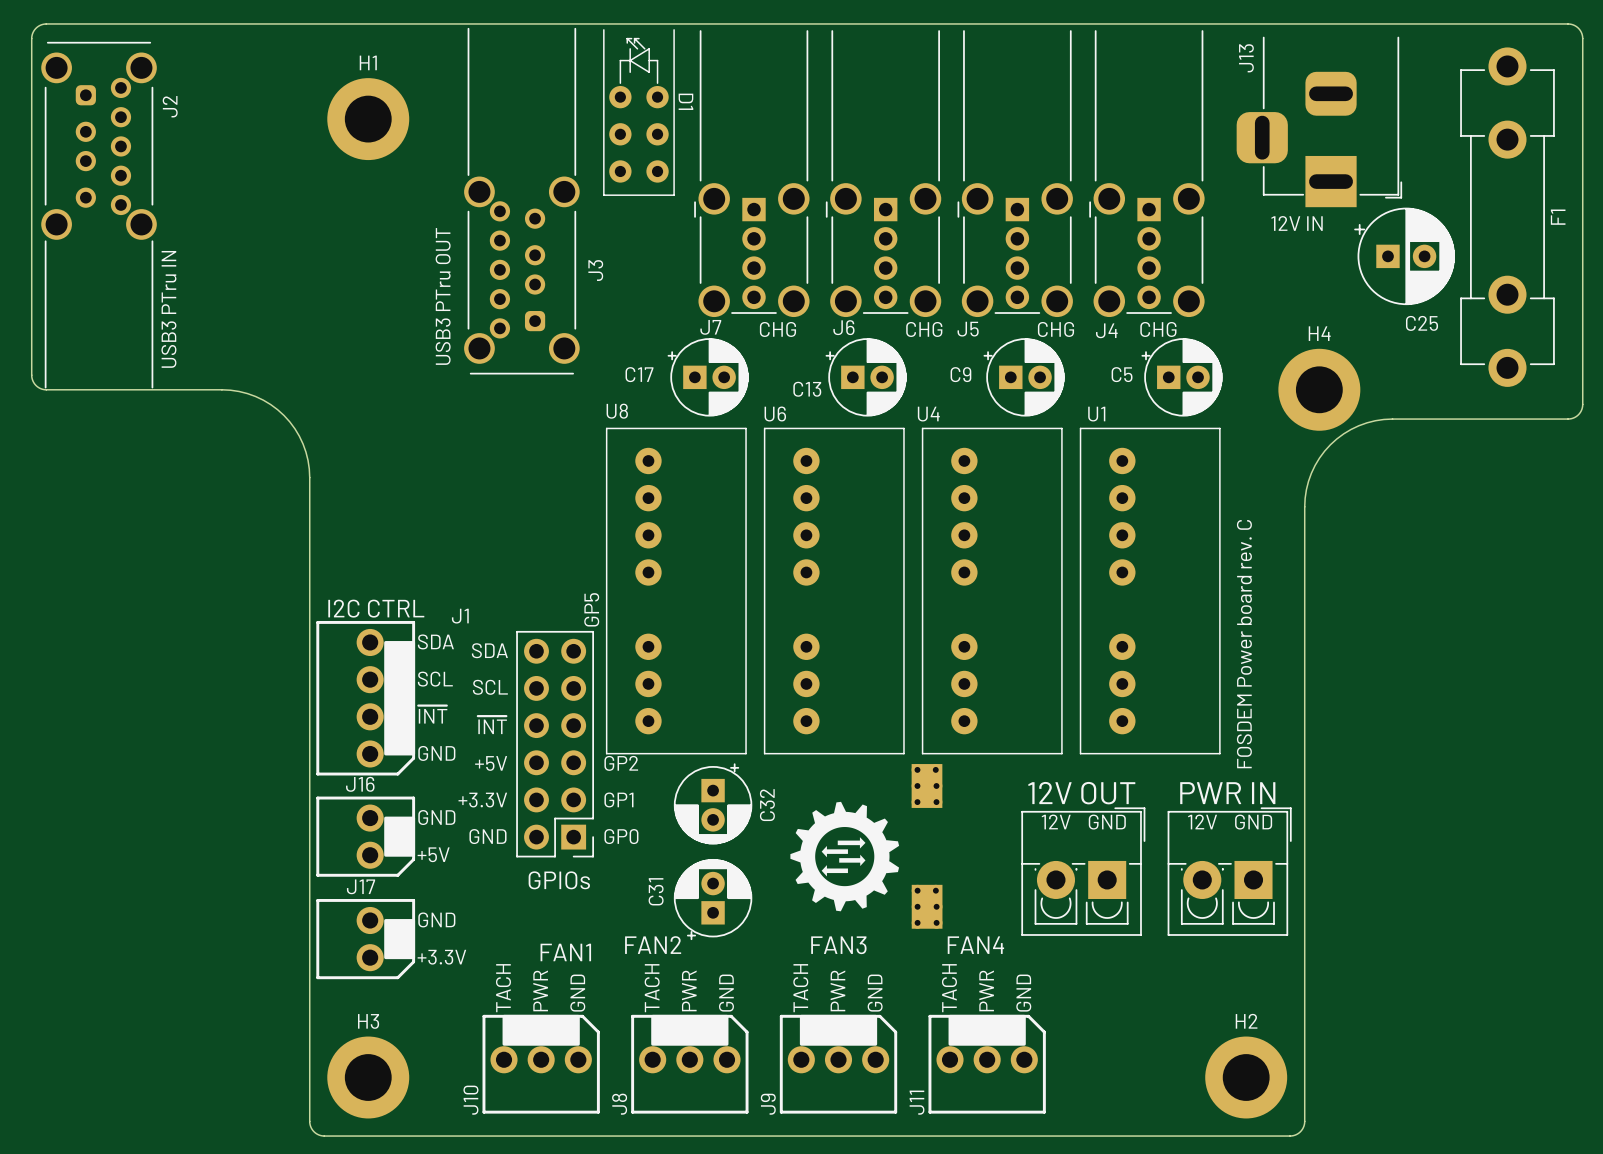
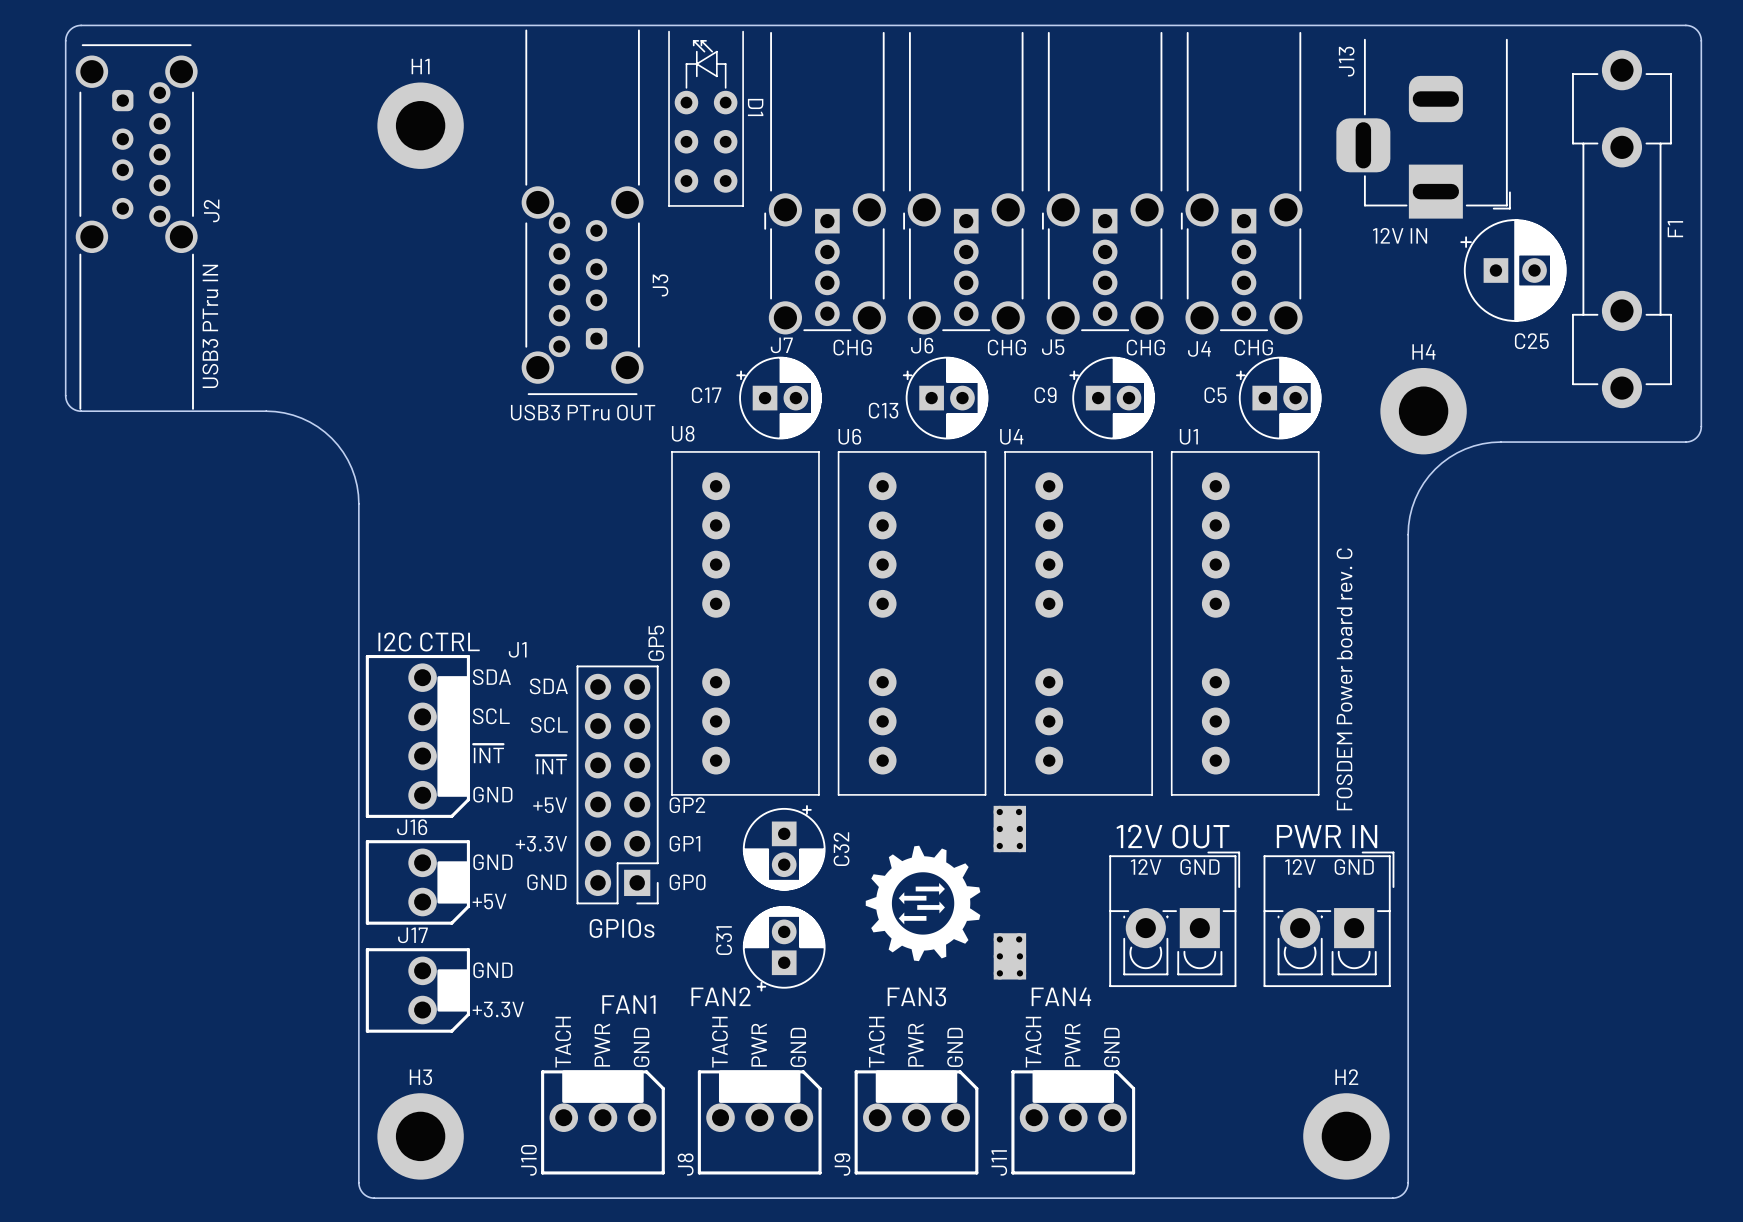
J2 name position: J2 (170, 106) -> J2 (211, 210)
J3 text rotation: 0° (443, 296) -> 90° clockwise (583, 412)

